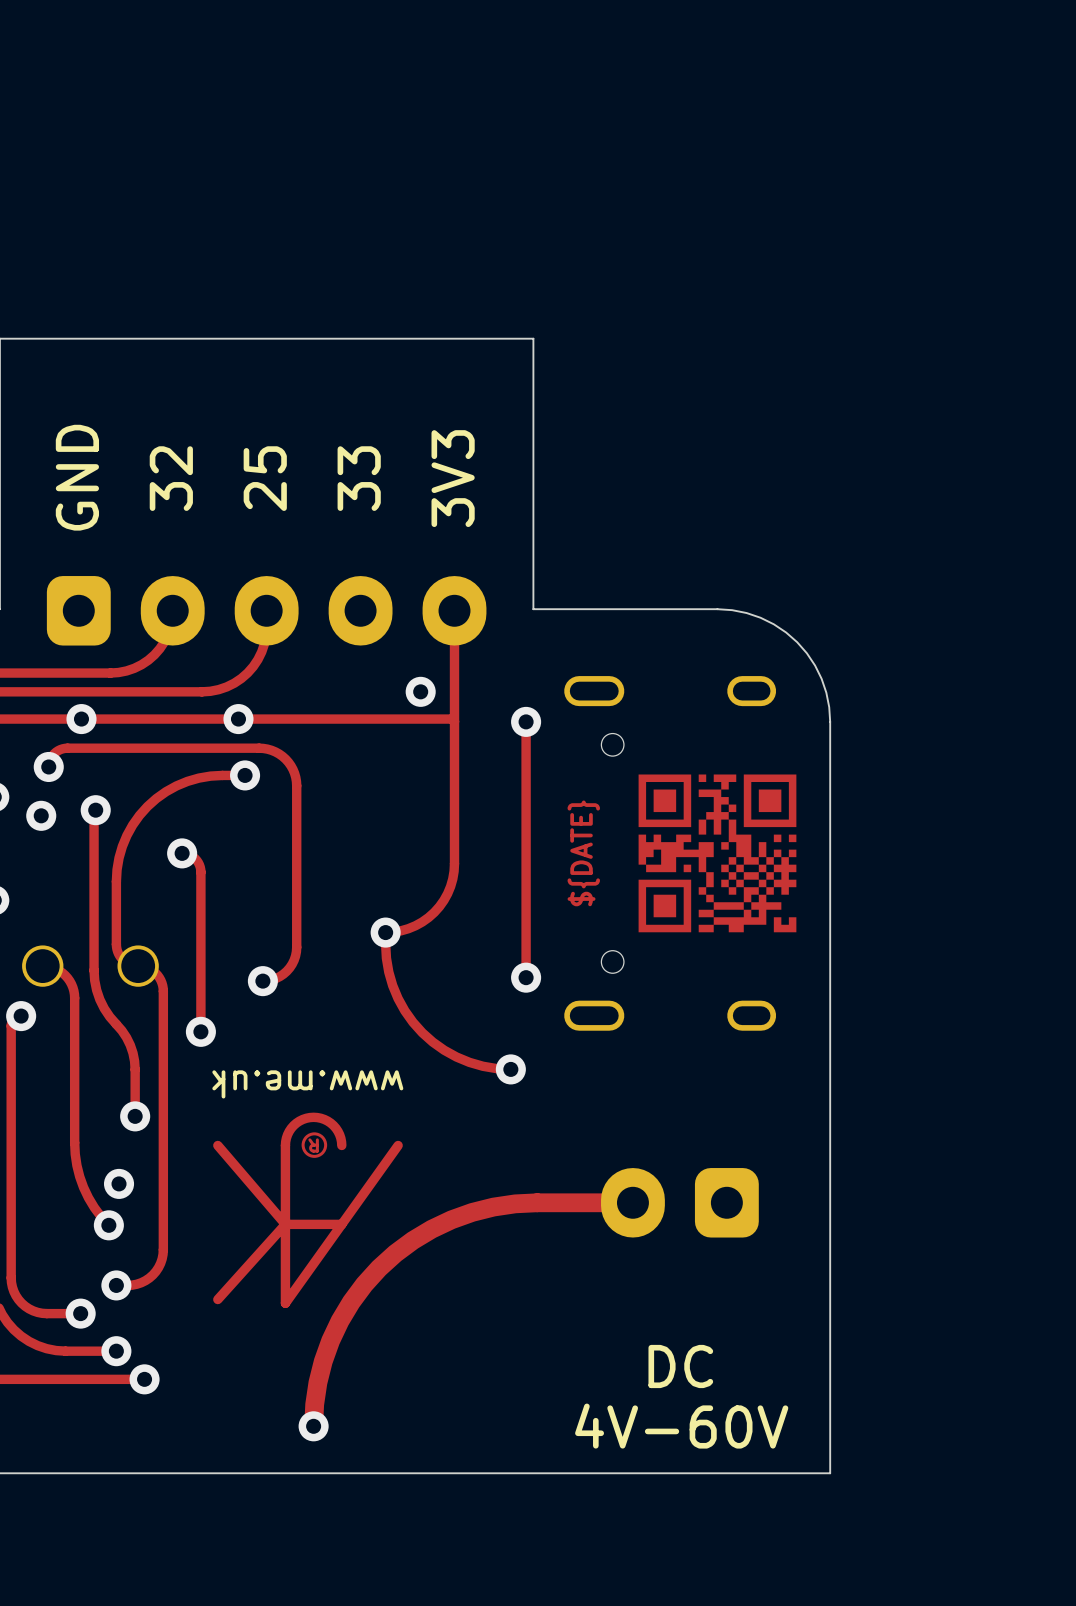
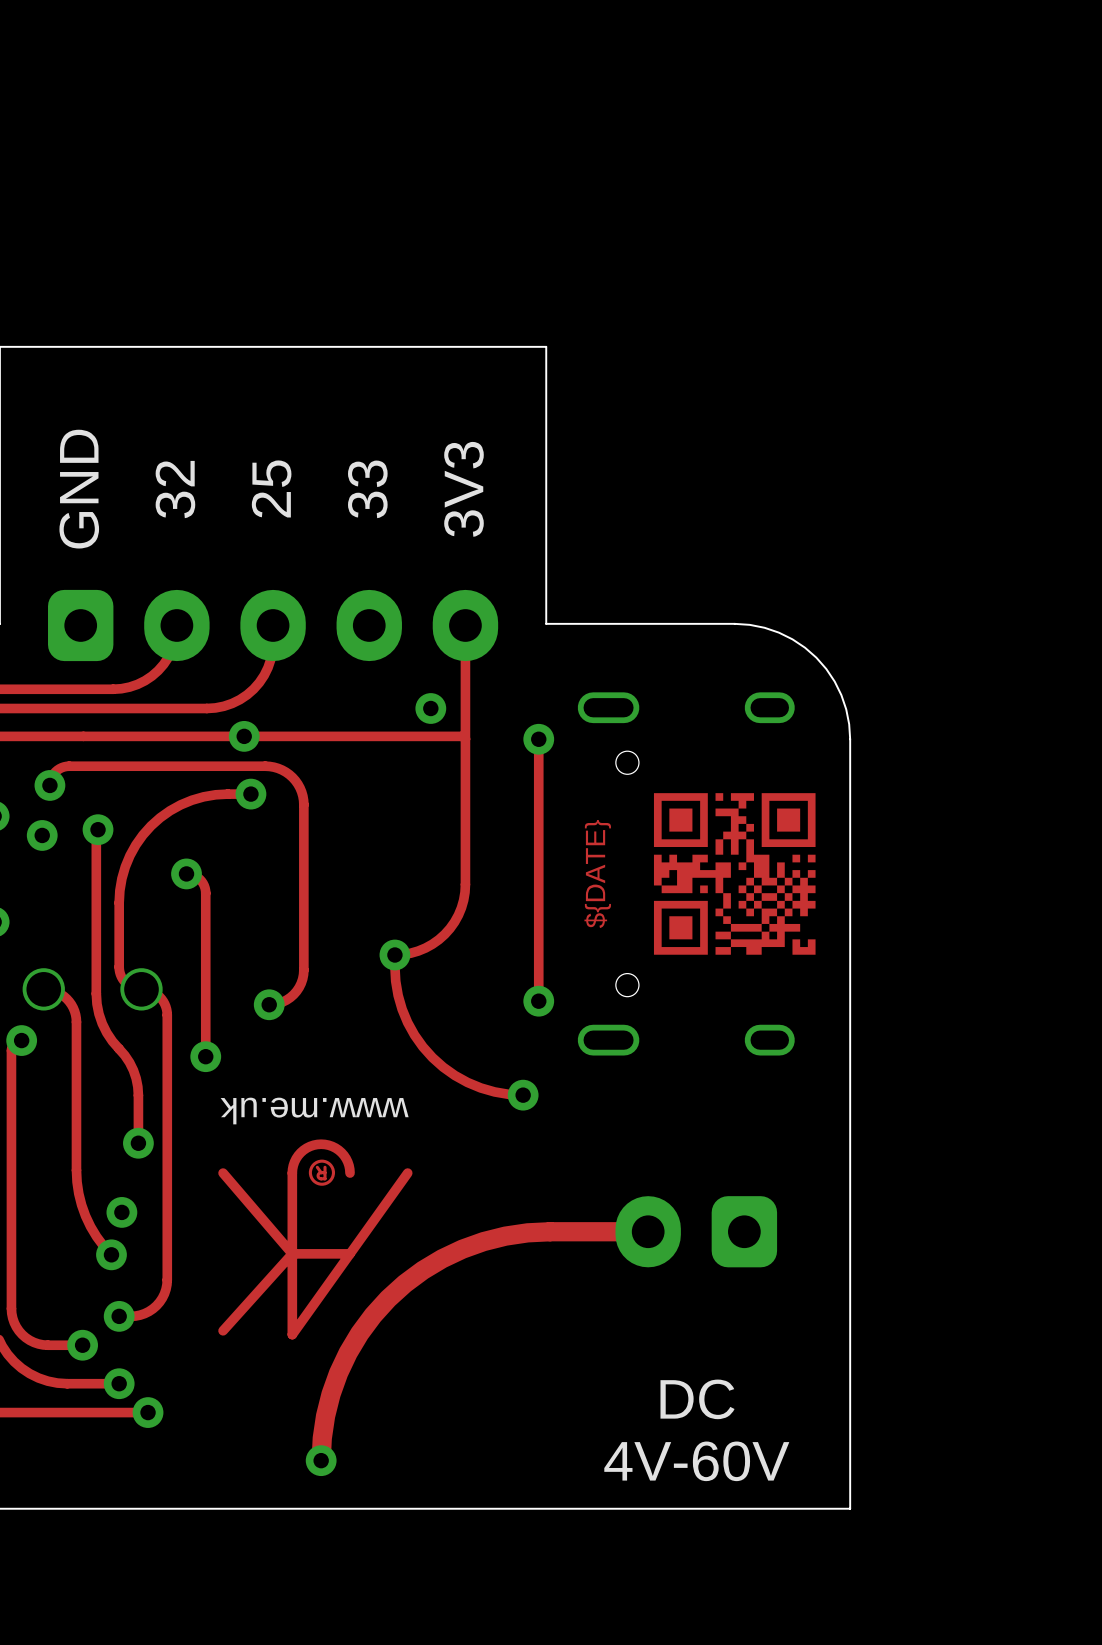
via: (81, 719) -> none

